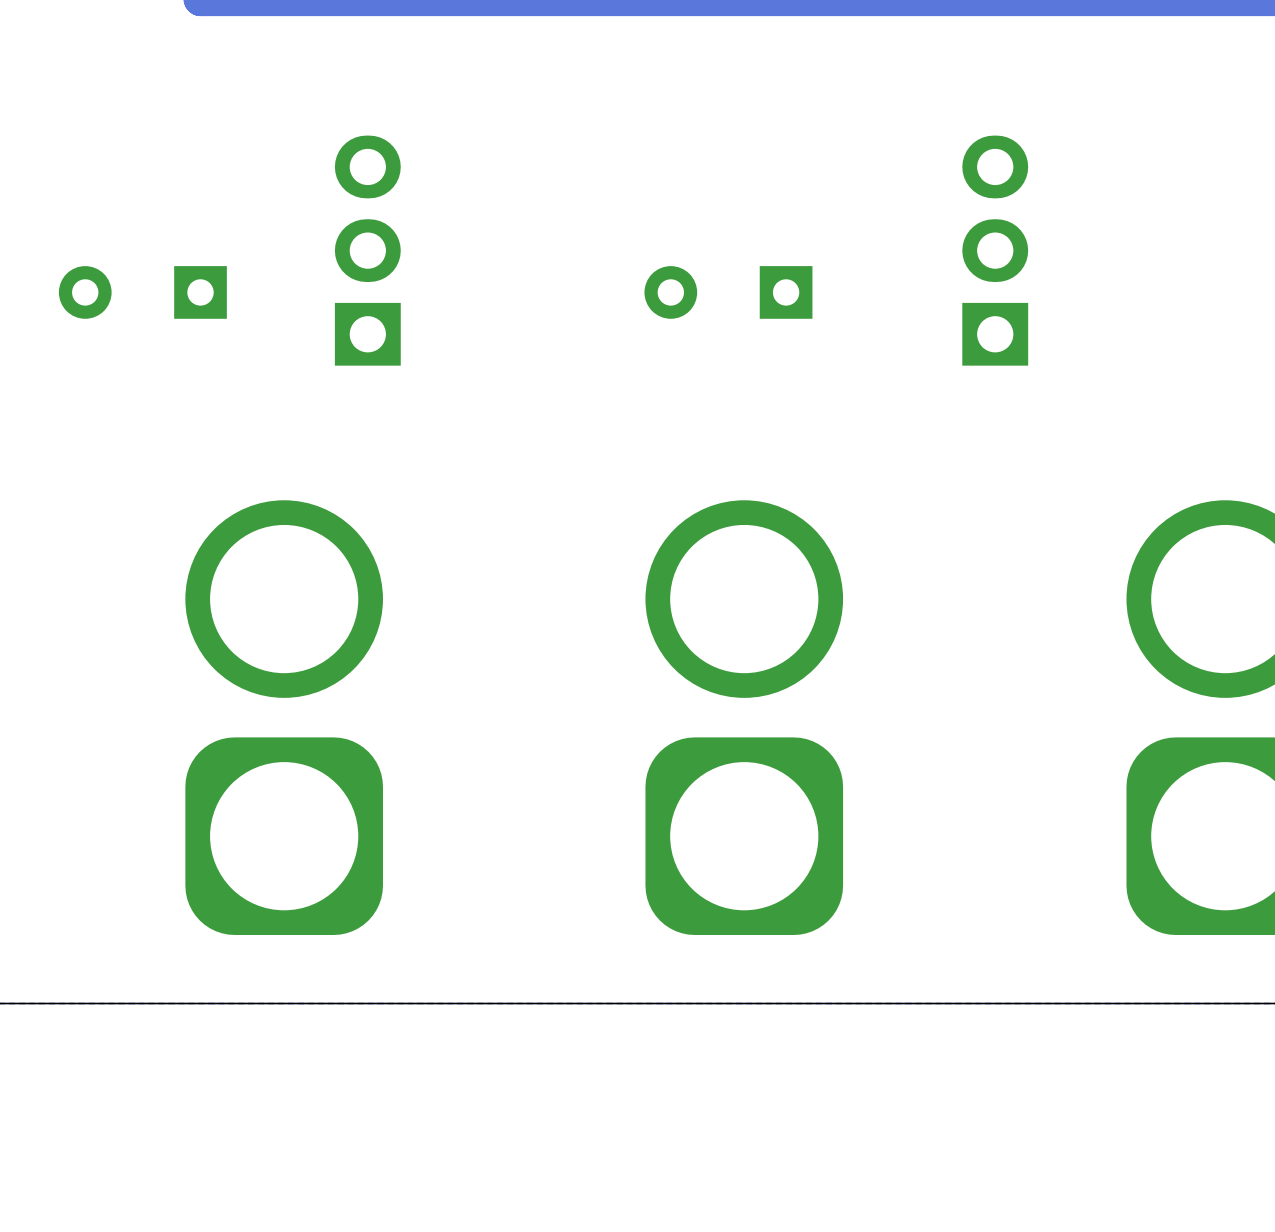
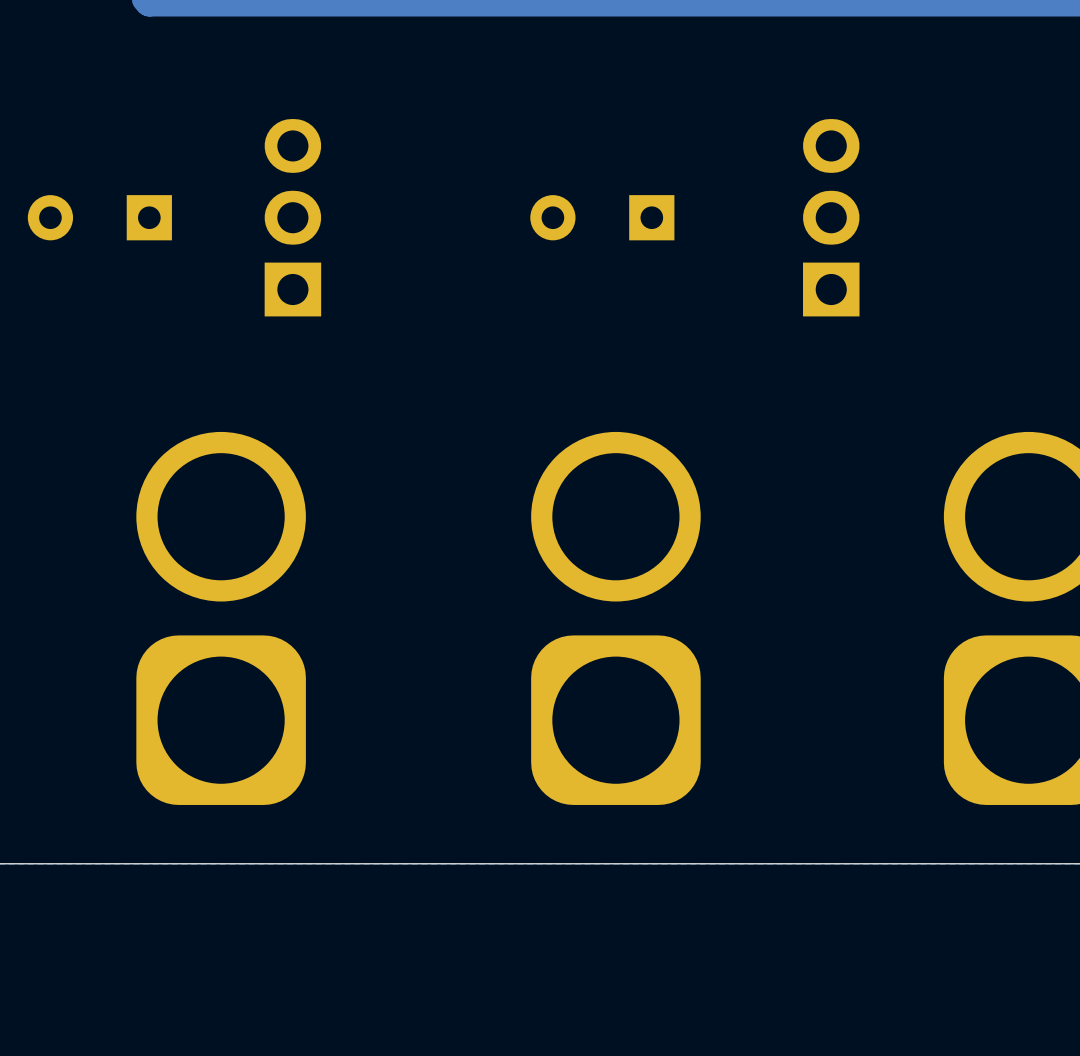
part position: (142, 292) -> (99, 217)
part position: (728, 292) -> (602, 217)

